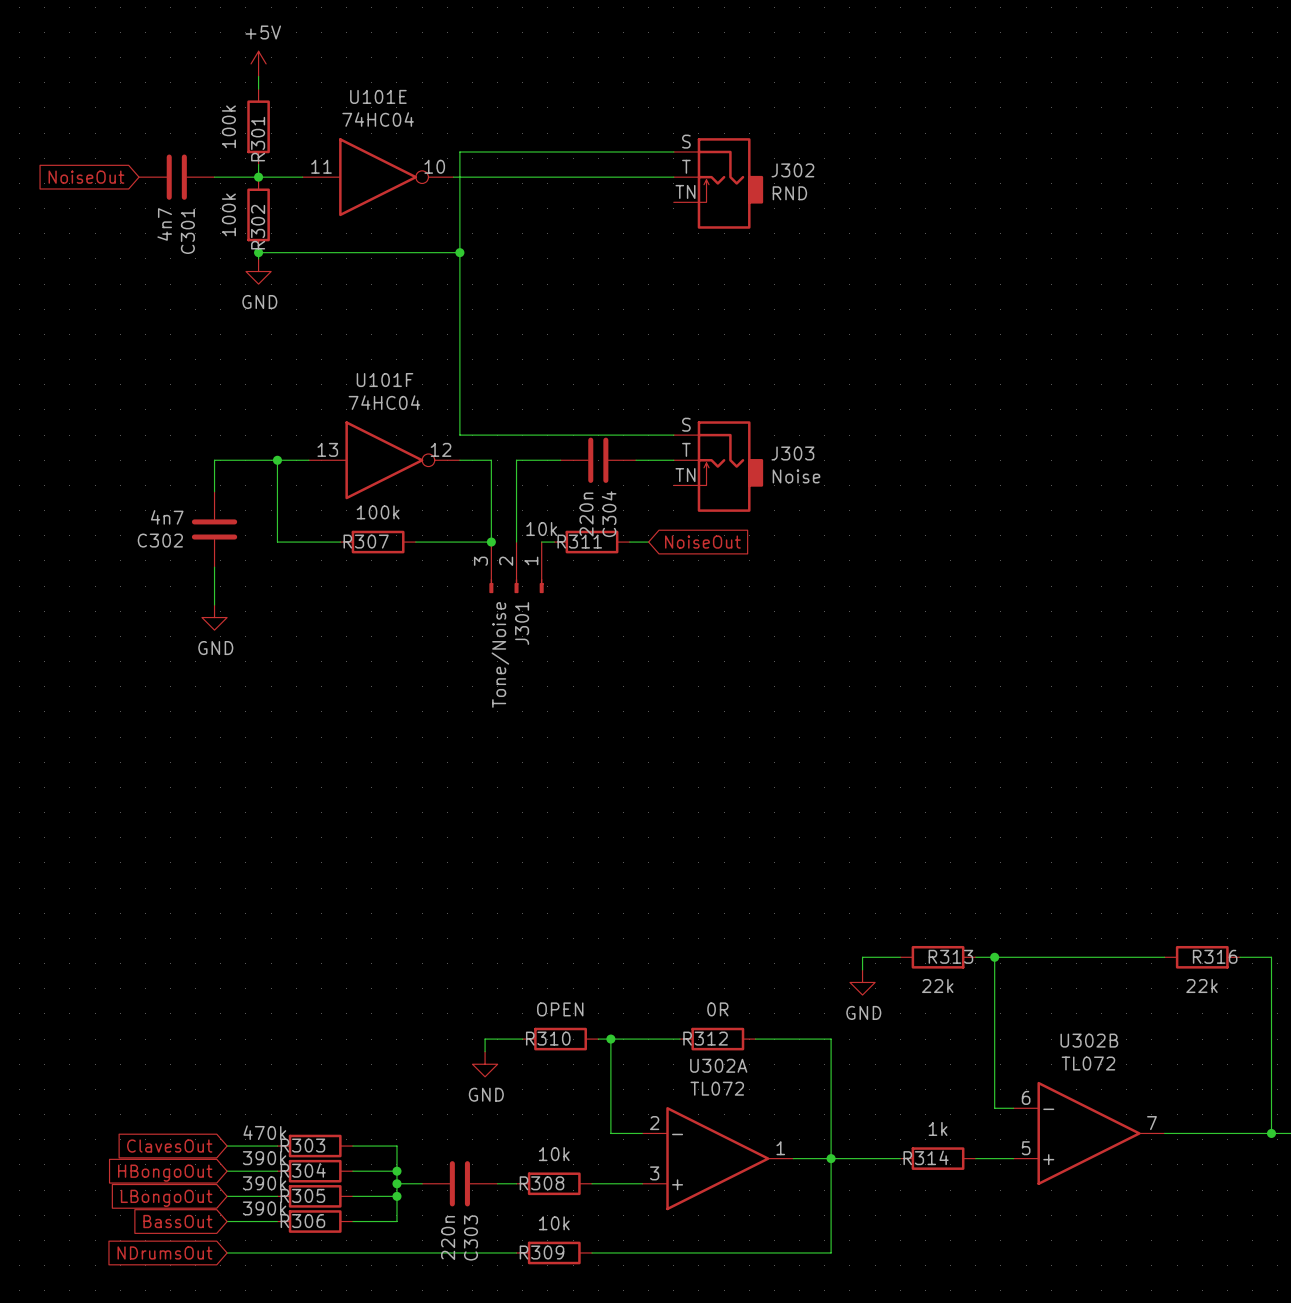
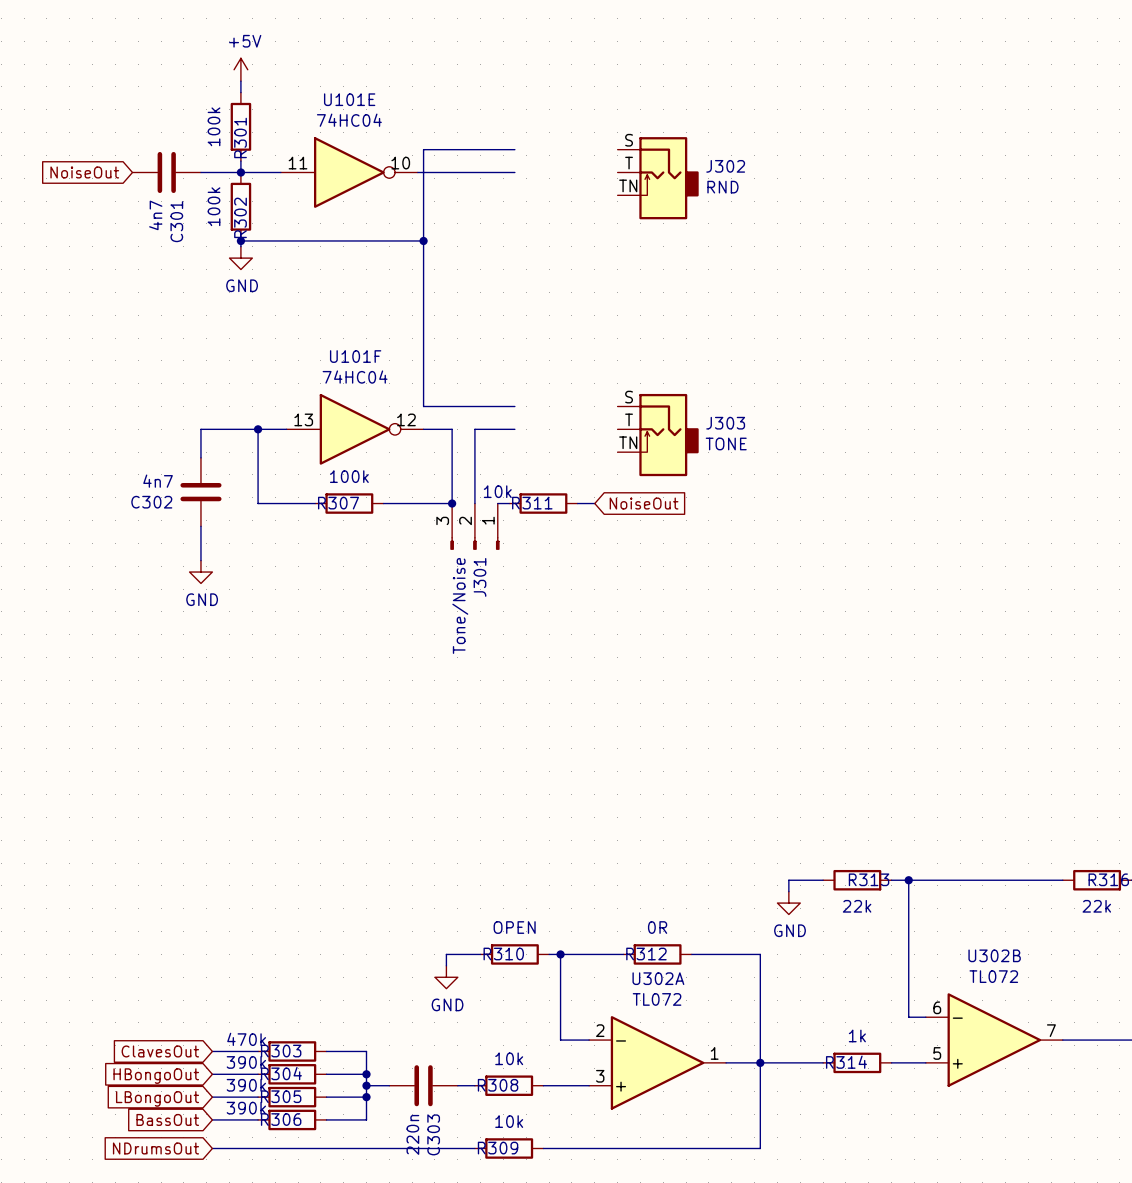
wire: (560, 151) (673, 151) -> none
wire: (560, 177) (673, 177) -> none
wire: (560, 435) (673, 435) -> none
C304: 220n (598, 460) -> none
wire: (636, 460) (673, 460) -> none
J303 value: Noise (796, 476) -> TONE (726, 443)

